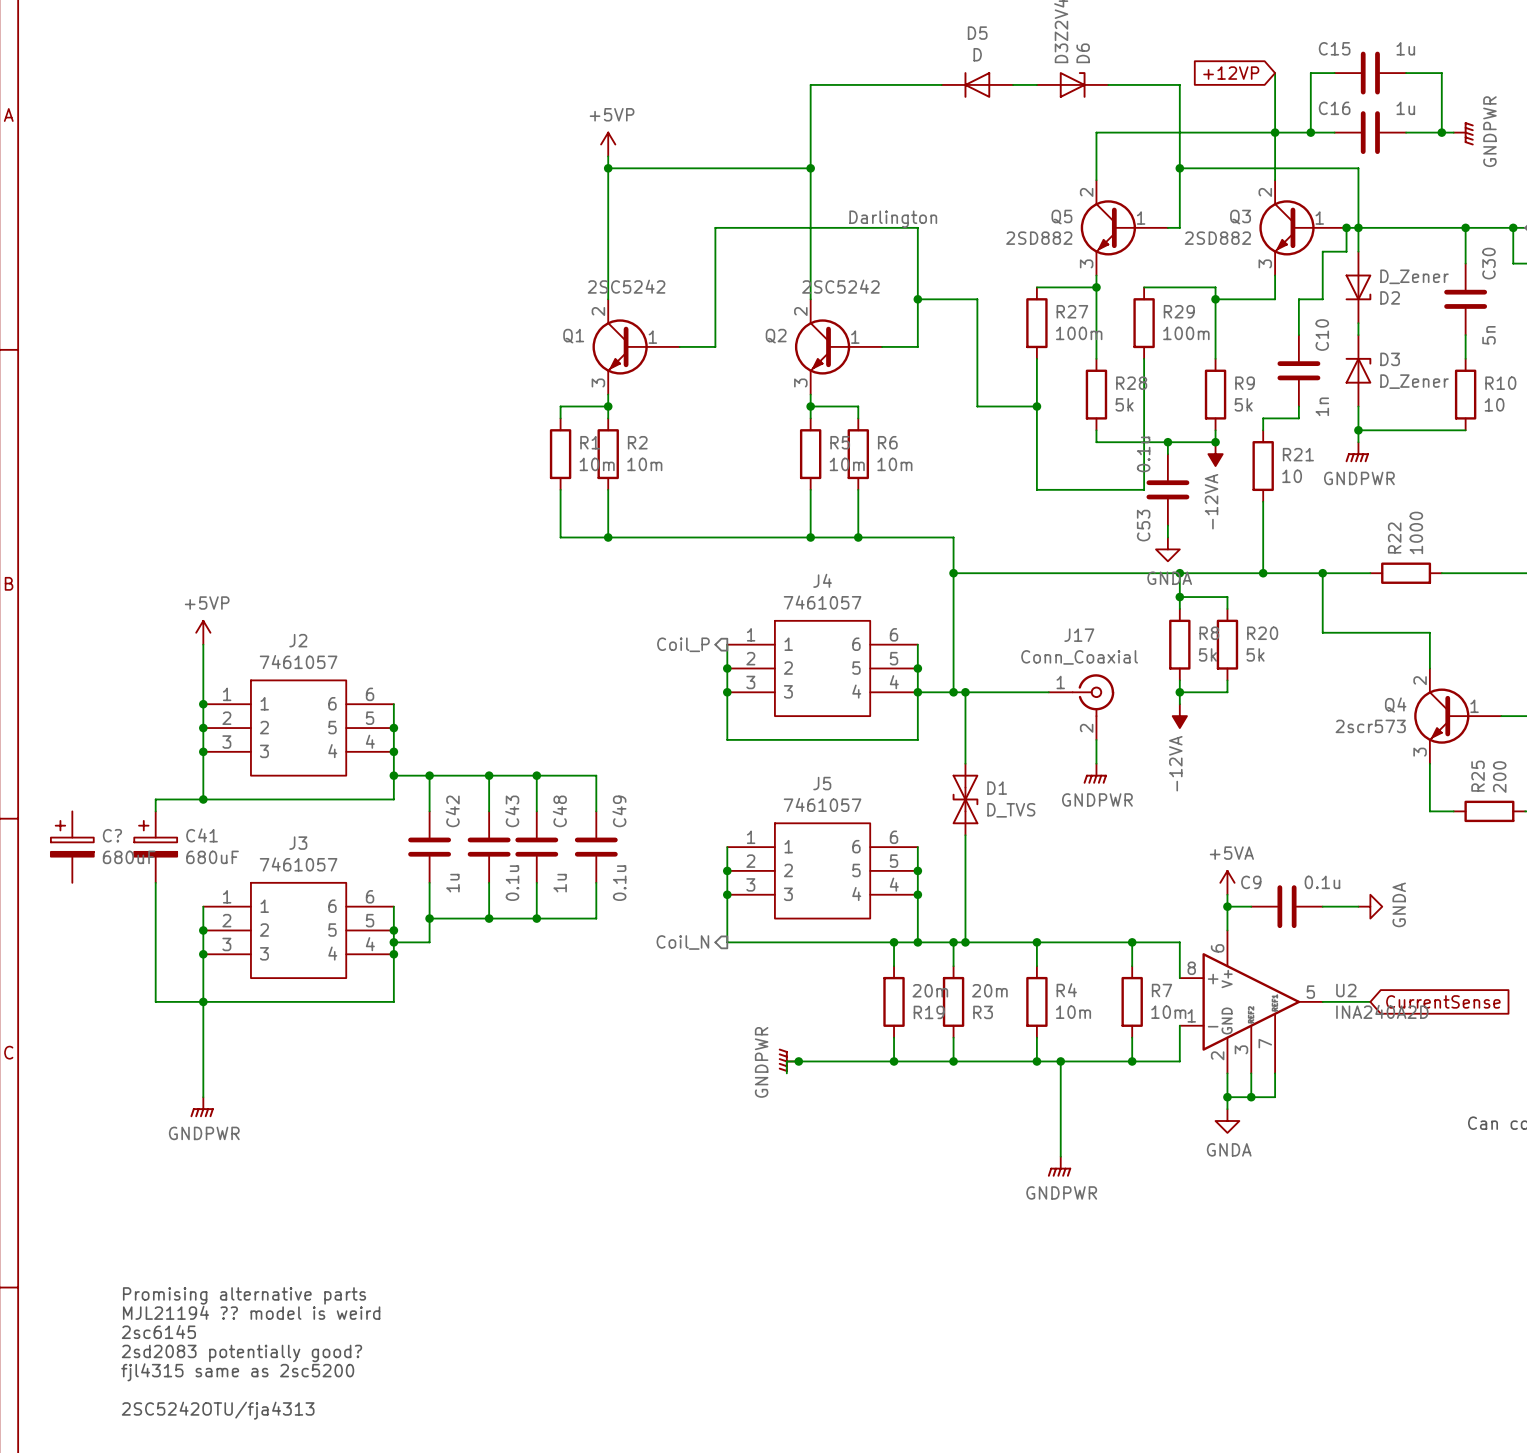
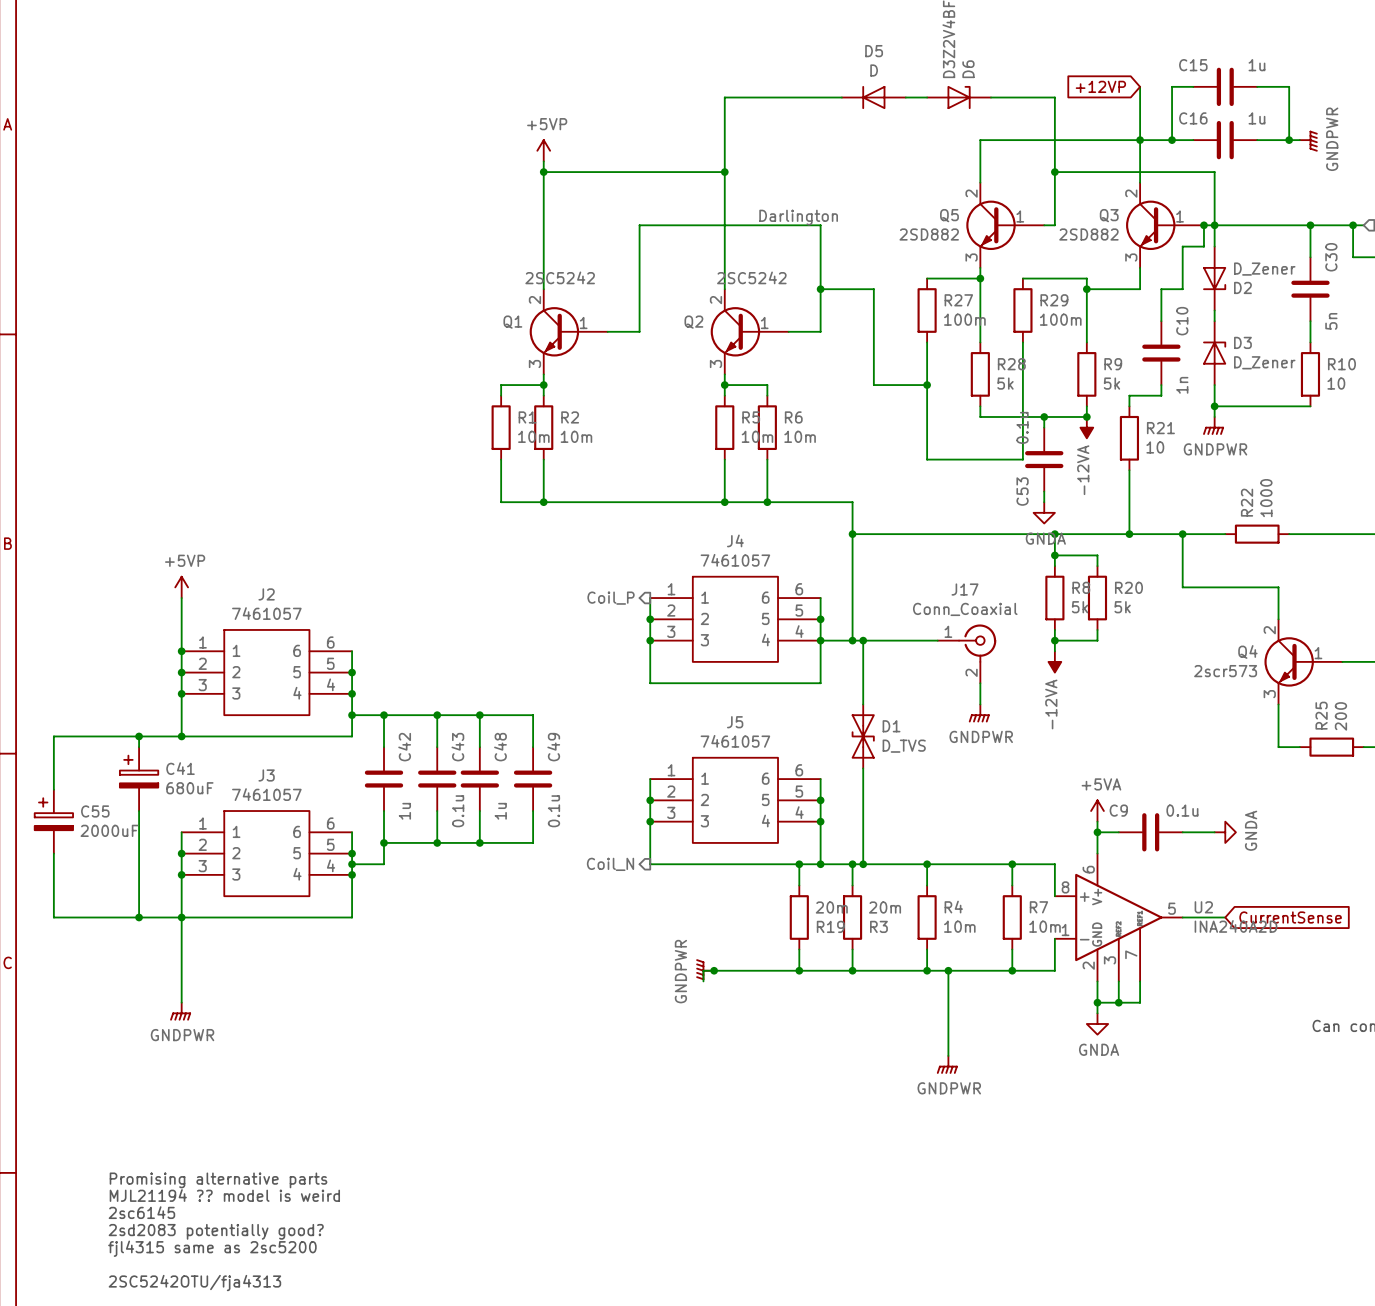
wire: none -> (139, 736) (53, 736) (53, 789)
junction: none -> (139, 736)
C?: 680uF (72, 847) -> none
C55: none -> 2000uF (53, 821)
wire: none -> (53, 853) (53, 917) (139, 917)
junction: none -> (139, 917)

